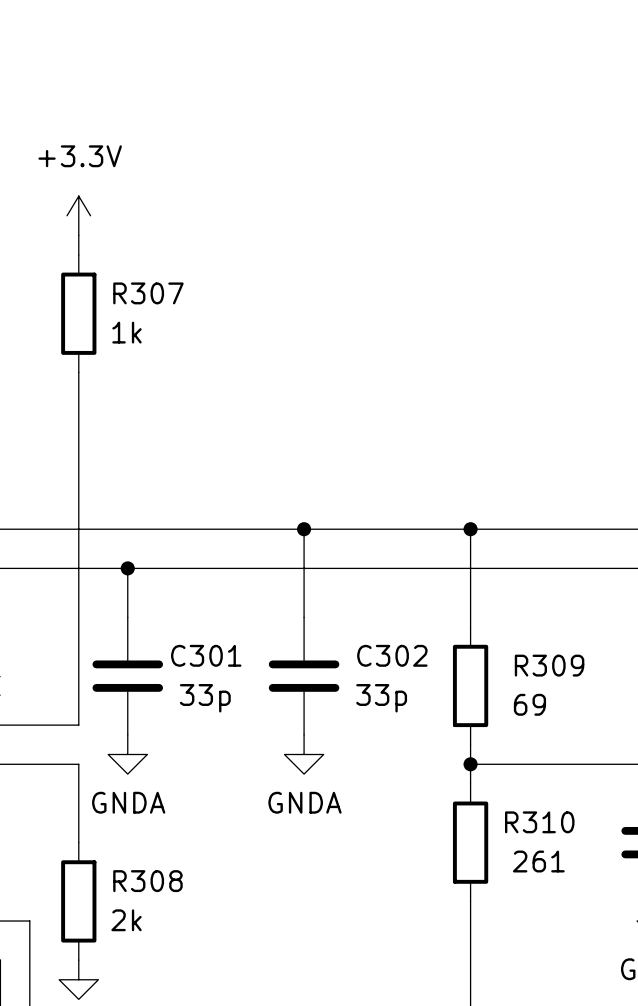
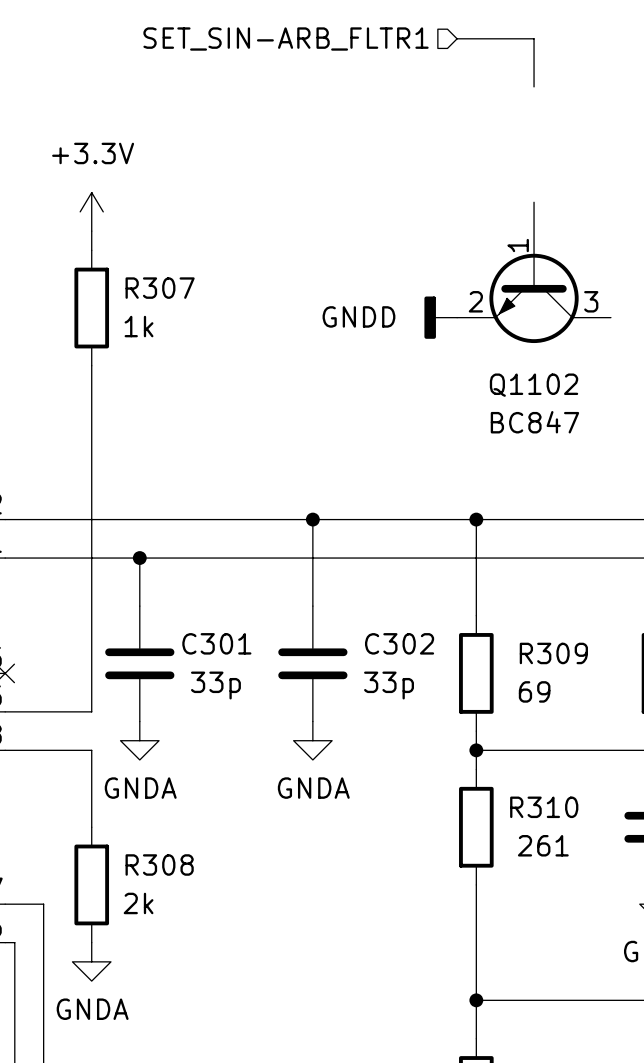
hierarchical label: none -> SET_SIN-ARB_FLTR1 (286, 39)
wire: none -> (457, 38) (534, 38) (534, 86)
Q1102: none -> BC847 (534, 272)
power symbol: none -> GNDD (440, 317)

